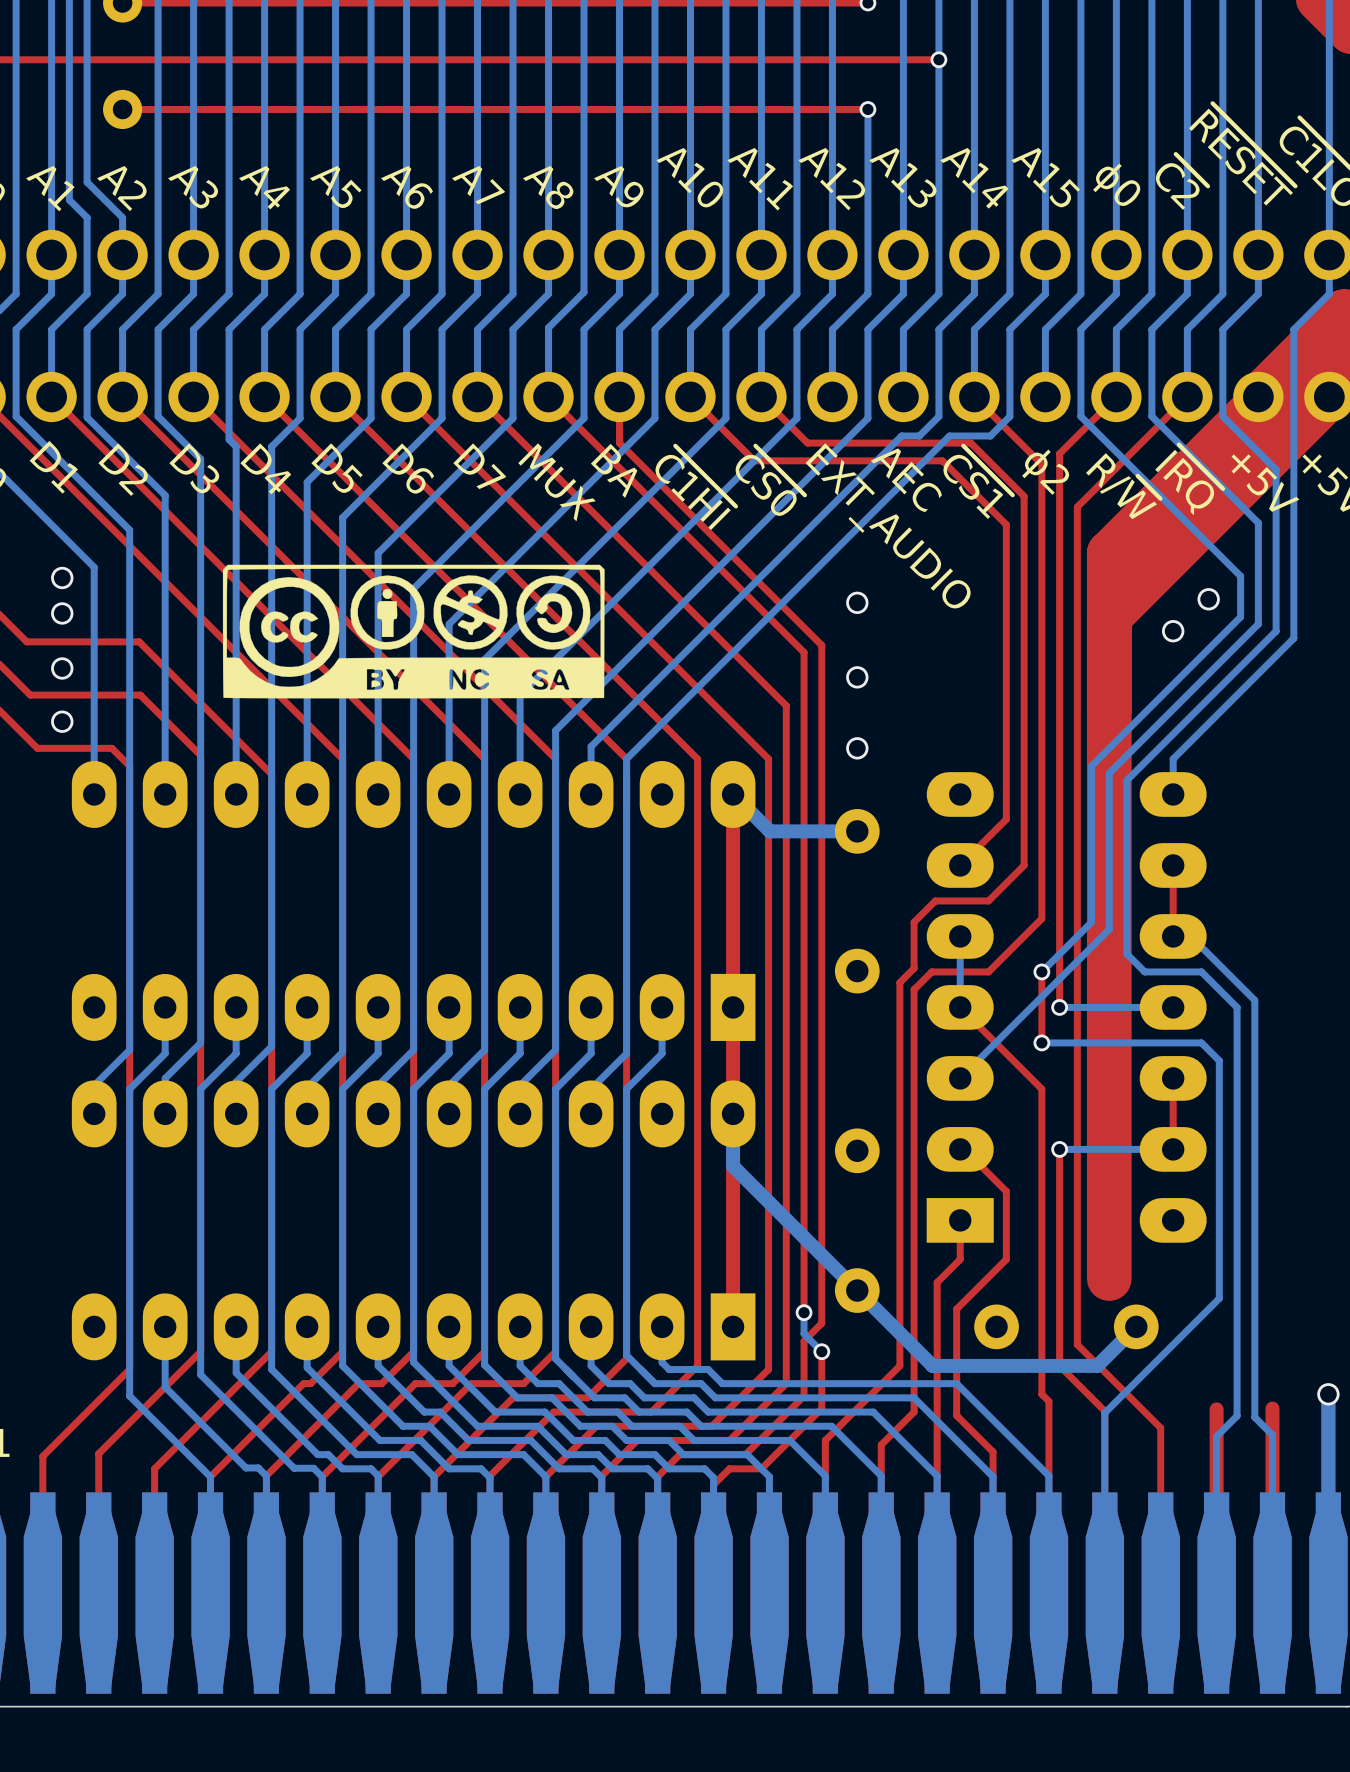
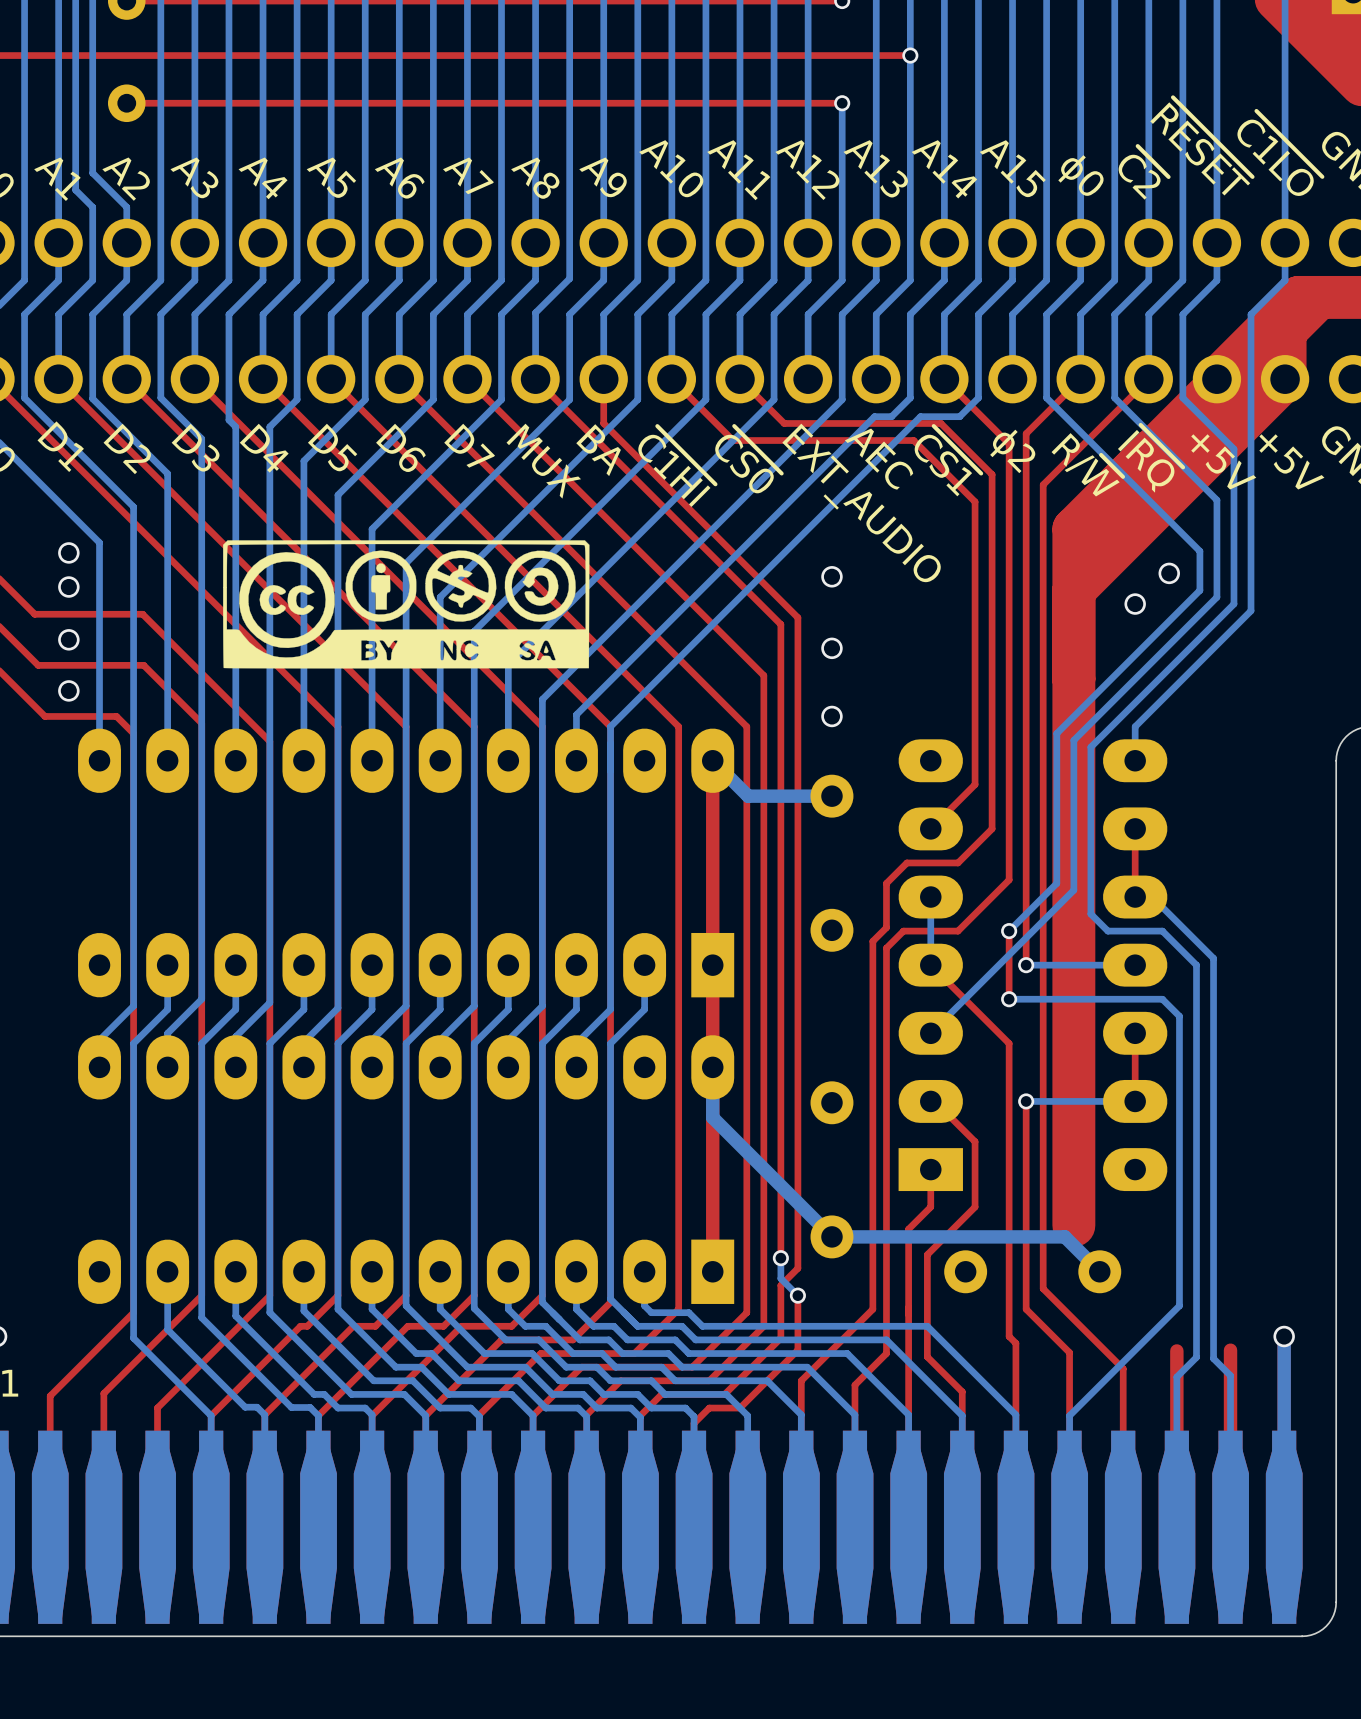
bottom track: (857, 1290) (932, 1365) (1097, 1365) (1136, 1326) -> (831, 1236) (1064, 1236) (1099, 1271)
bottom track: (1219, 1298) (1104, 1412) (1104, 1476) -> (1179, 1244) (1179, 1305) (1069, 1415)

